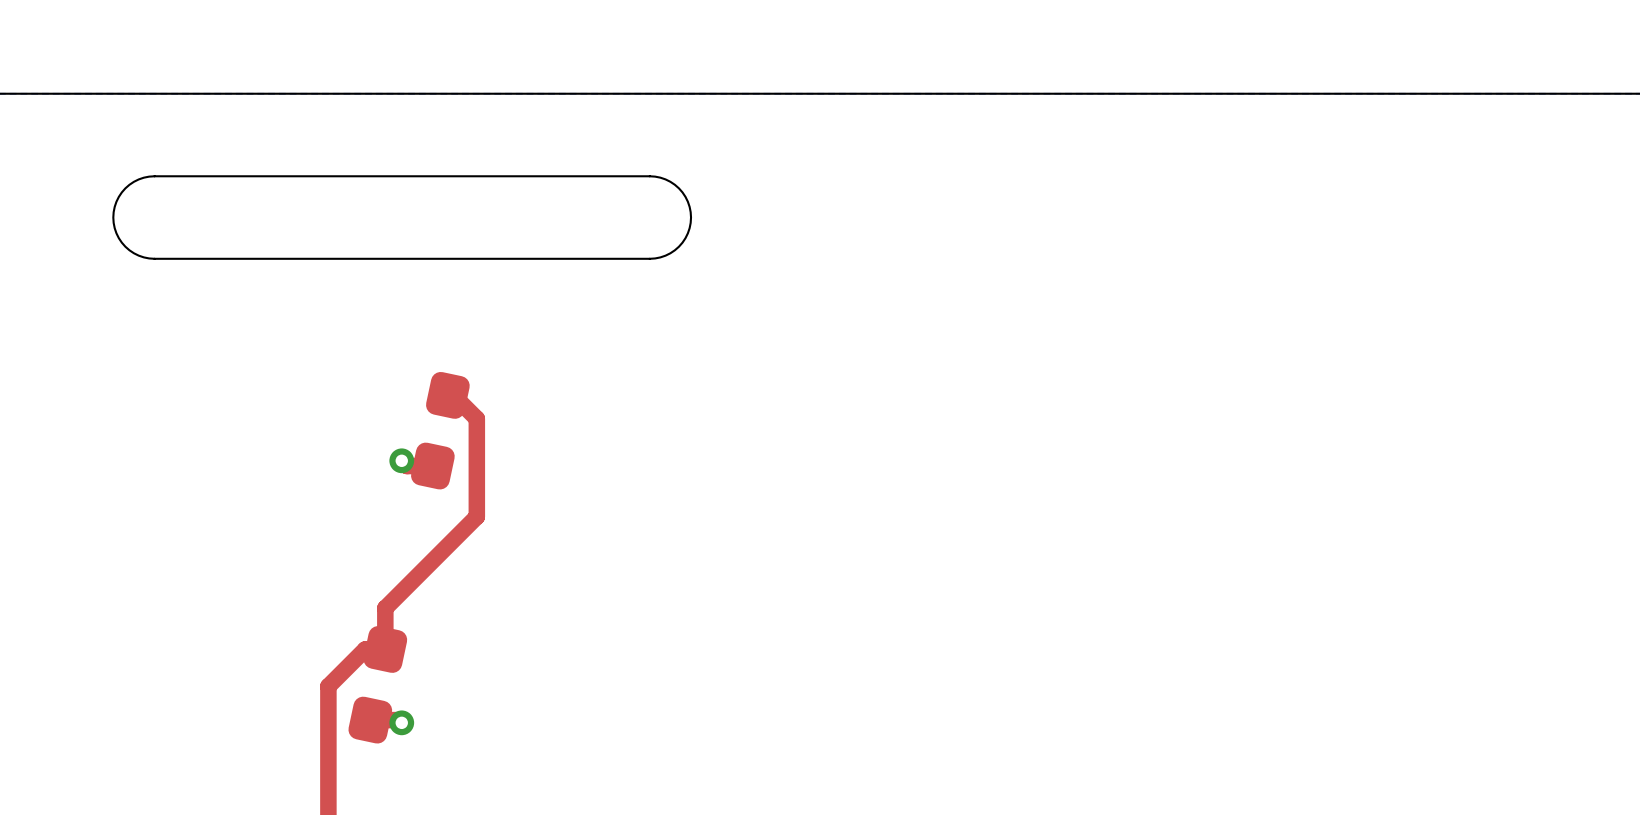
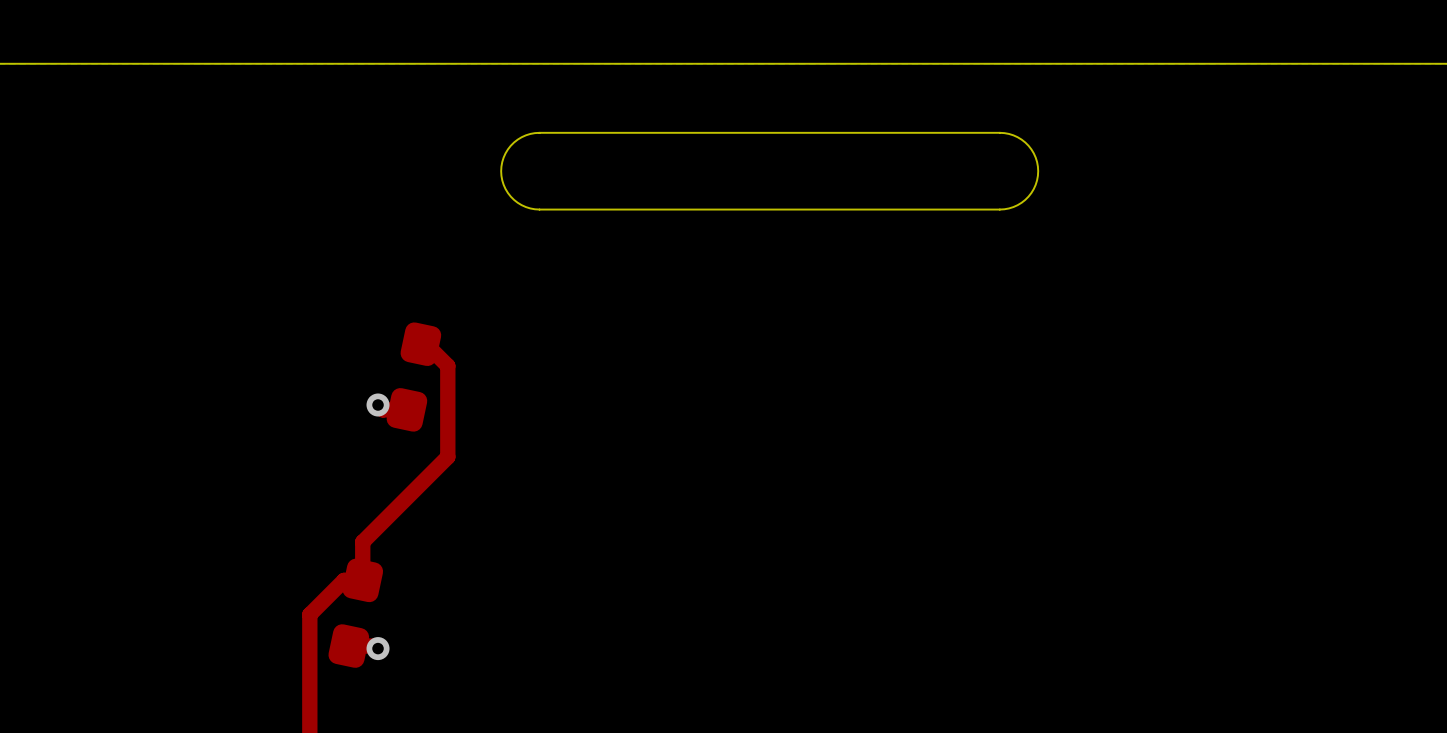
board edge: none -> (999, 132) (534, 133) (517, 139) (507, 149) (502, 162) (501, 175) (505, 189) (510, 196) (521, 205) (534, 209) (1004, 209) (1017, 205) (1031, 192) (1037, 180) (1037, 166) (1033, 153) (1025, 142) (1013, 135) (999, 132)
board edge: (649, 176) (149, 176) (133, 181) (121, 192) (114, 206) (113, 222) (116, 233) (125, 246) (133, 253) (149, 258) (655, 258) (670, 253) (678, 246) (687, 233) (691, 217) (687, 201) (678, 188) (665, 179) (649, 176) -> none

